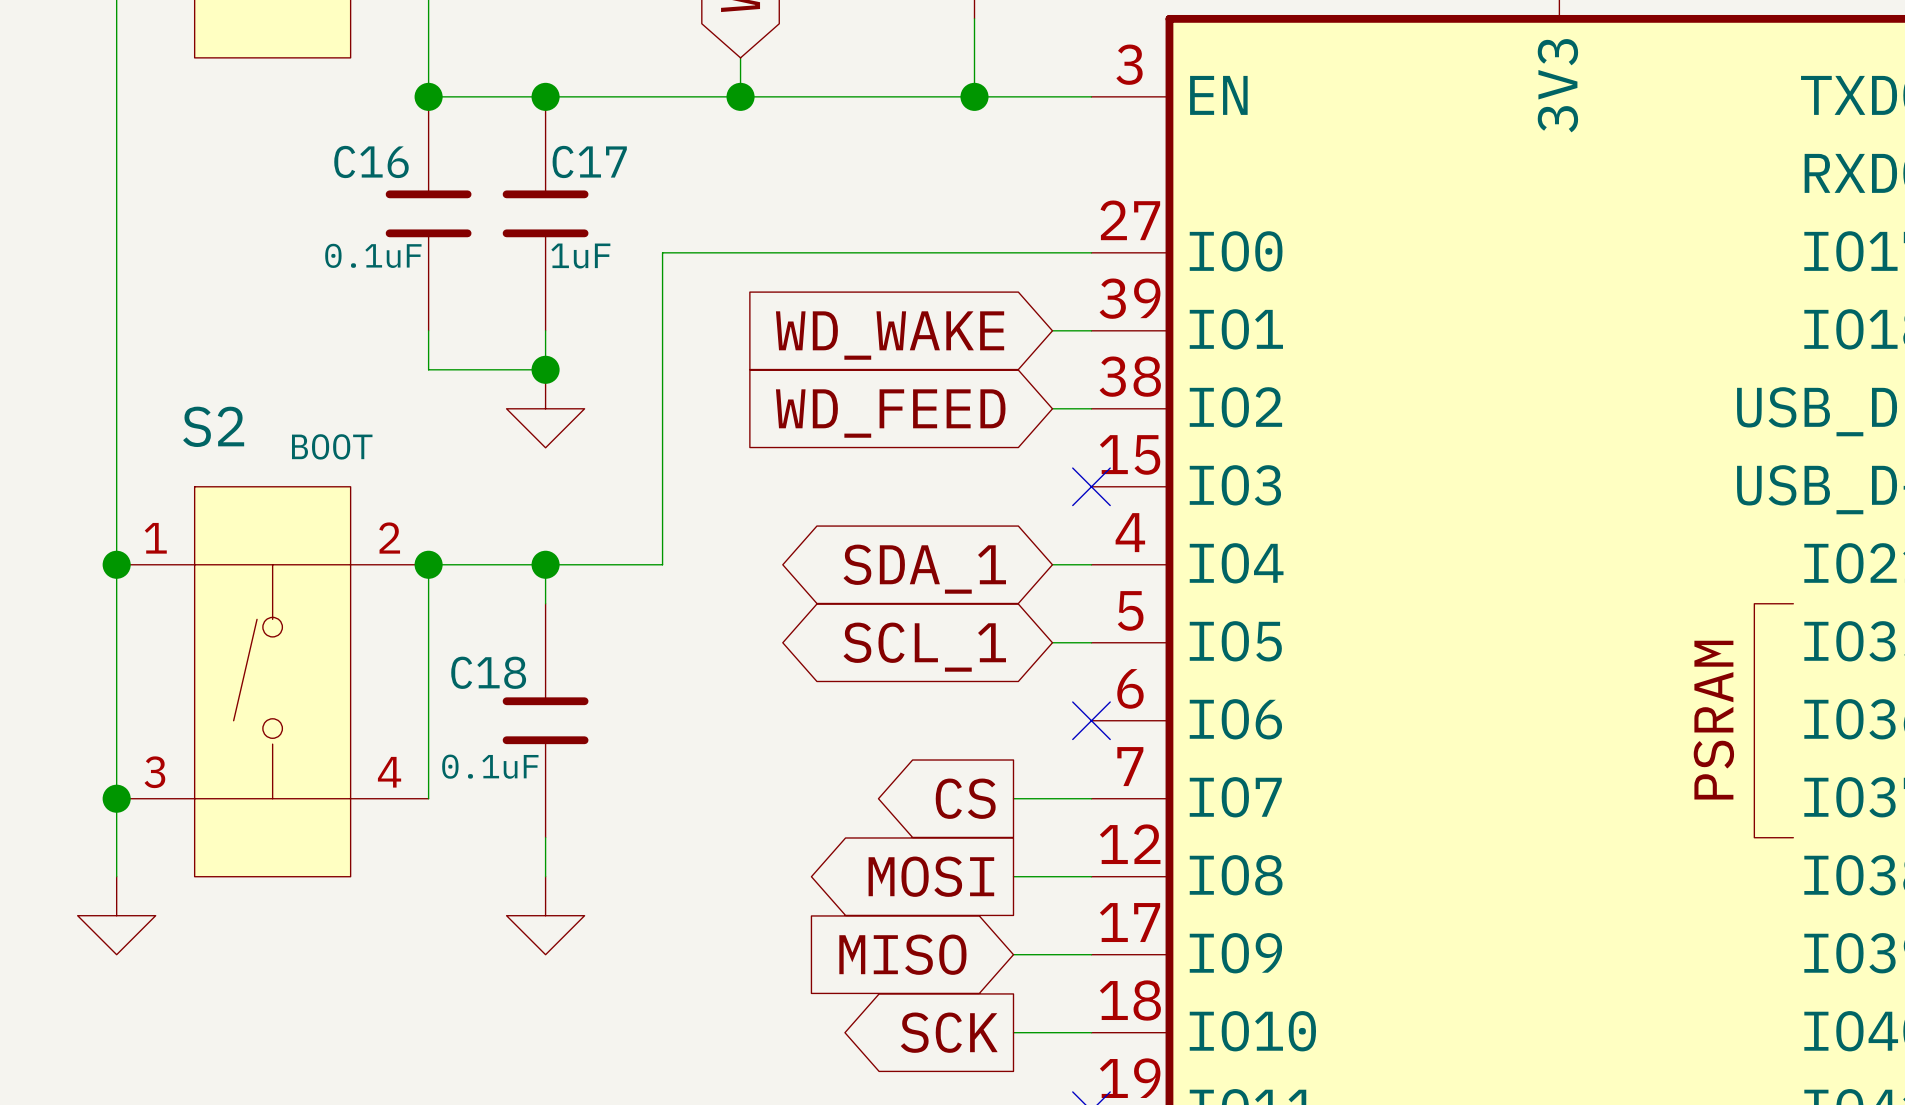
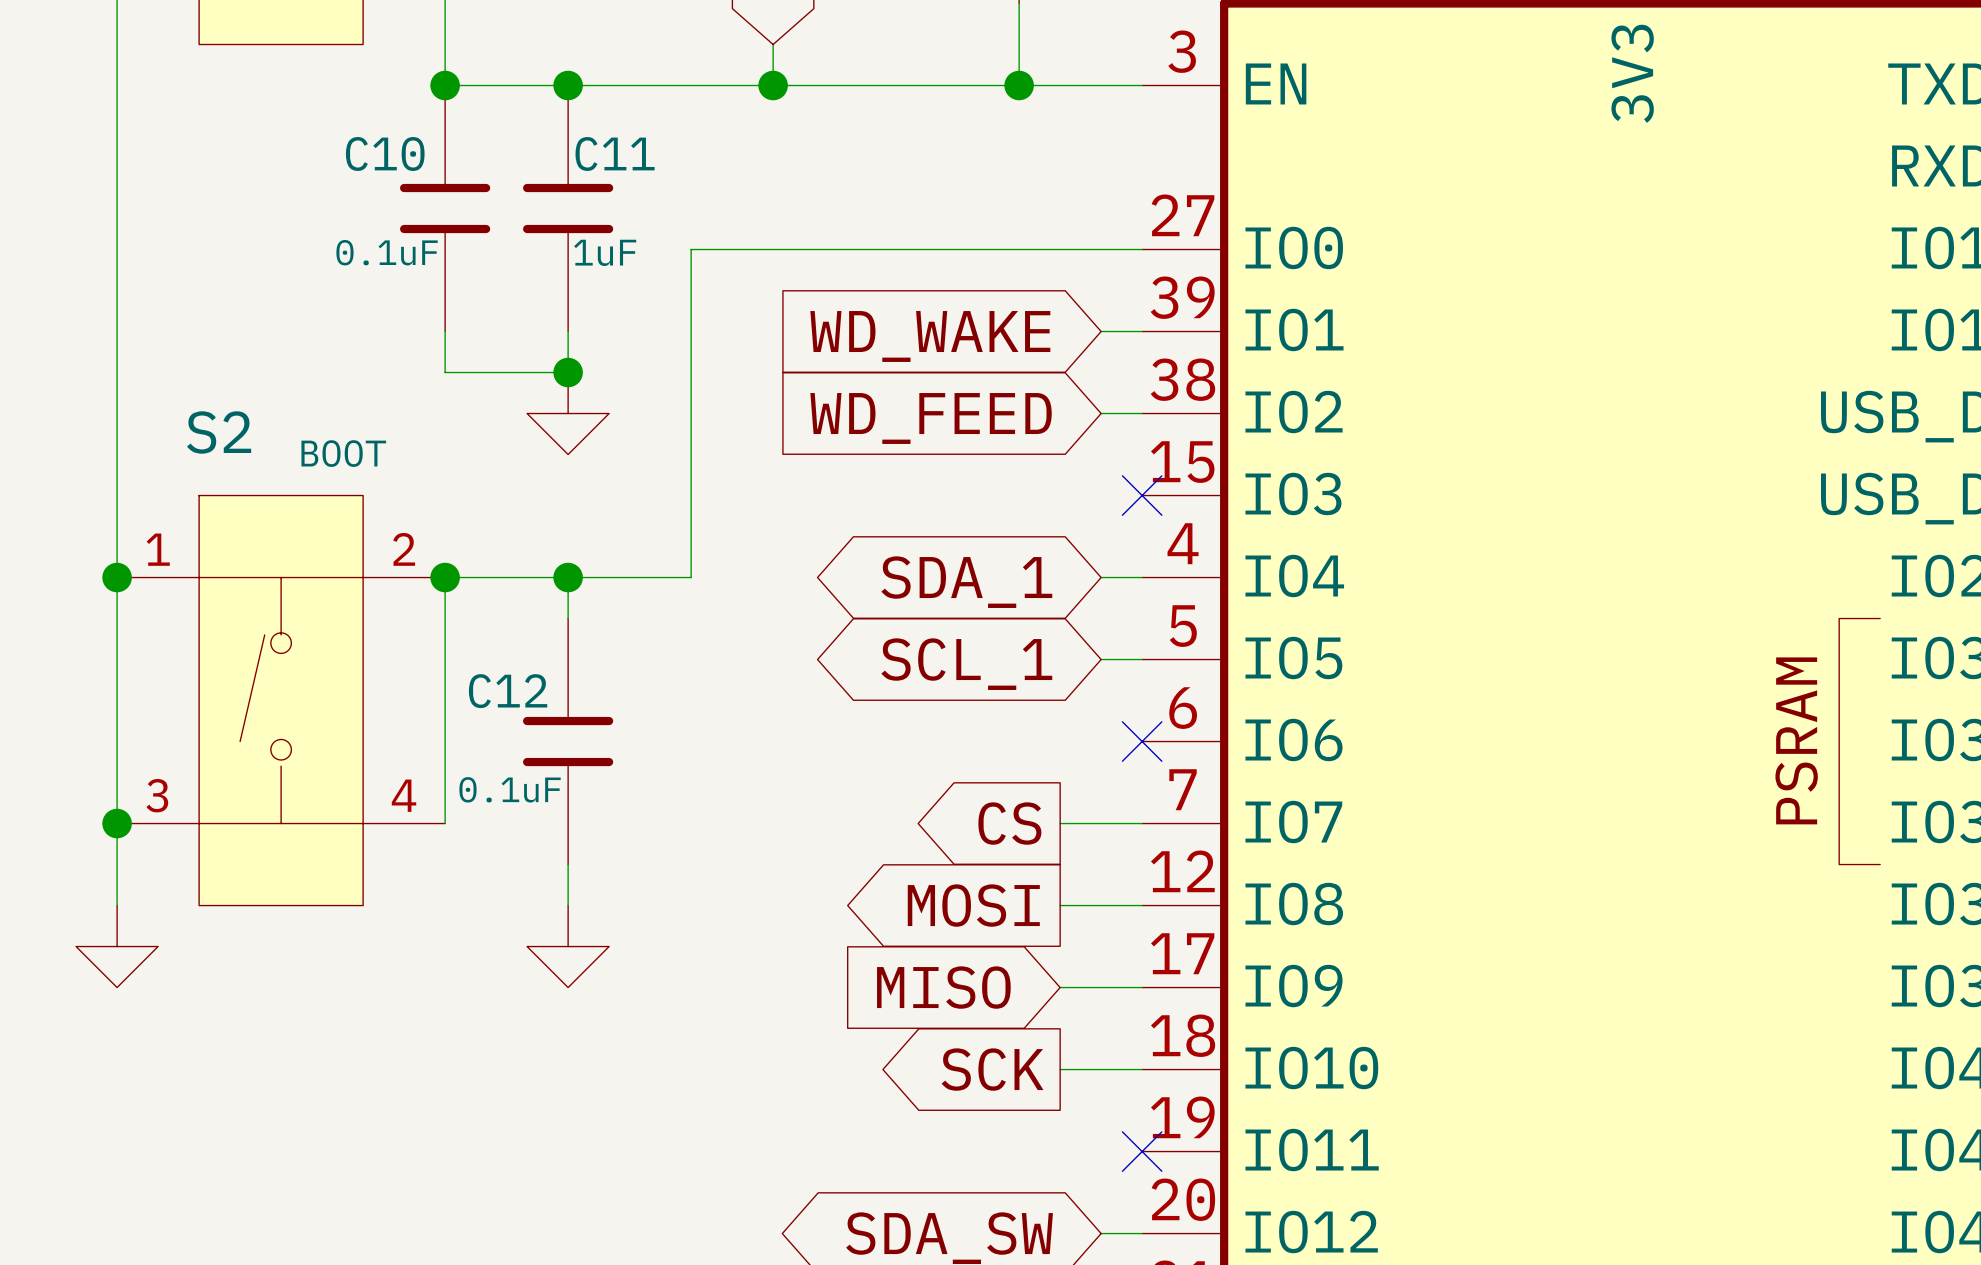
C16 name: C16 (371, 161) -> C10 (385, 153)
C17 name: C17 (589, 161) -> C11 (615, 153)
C18 name: C18 (488, 672) -> C12 (508, 691)

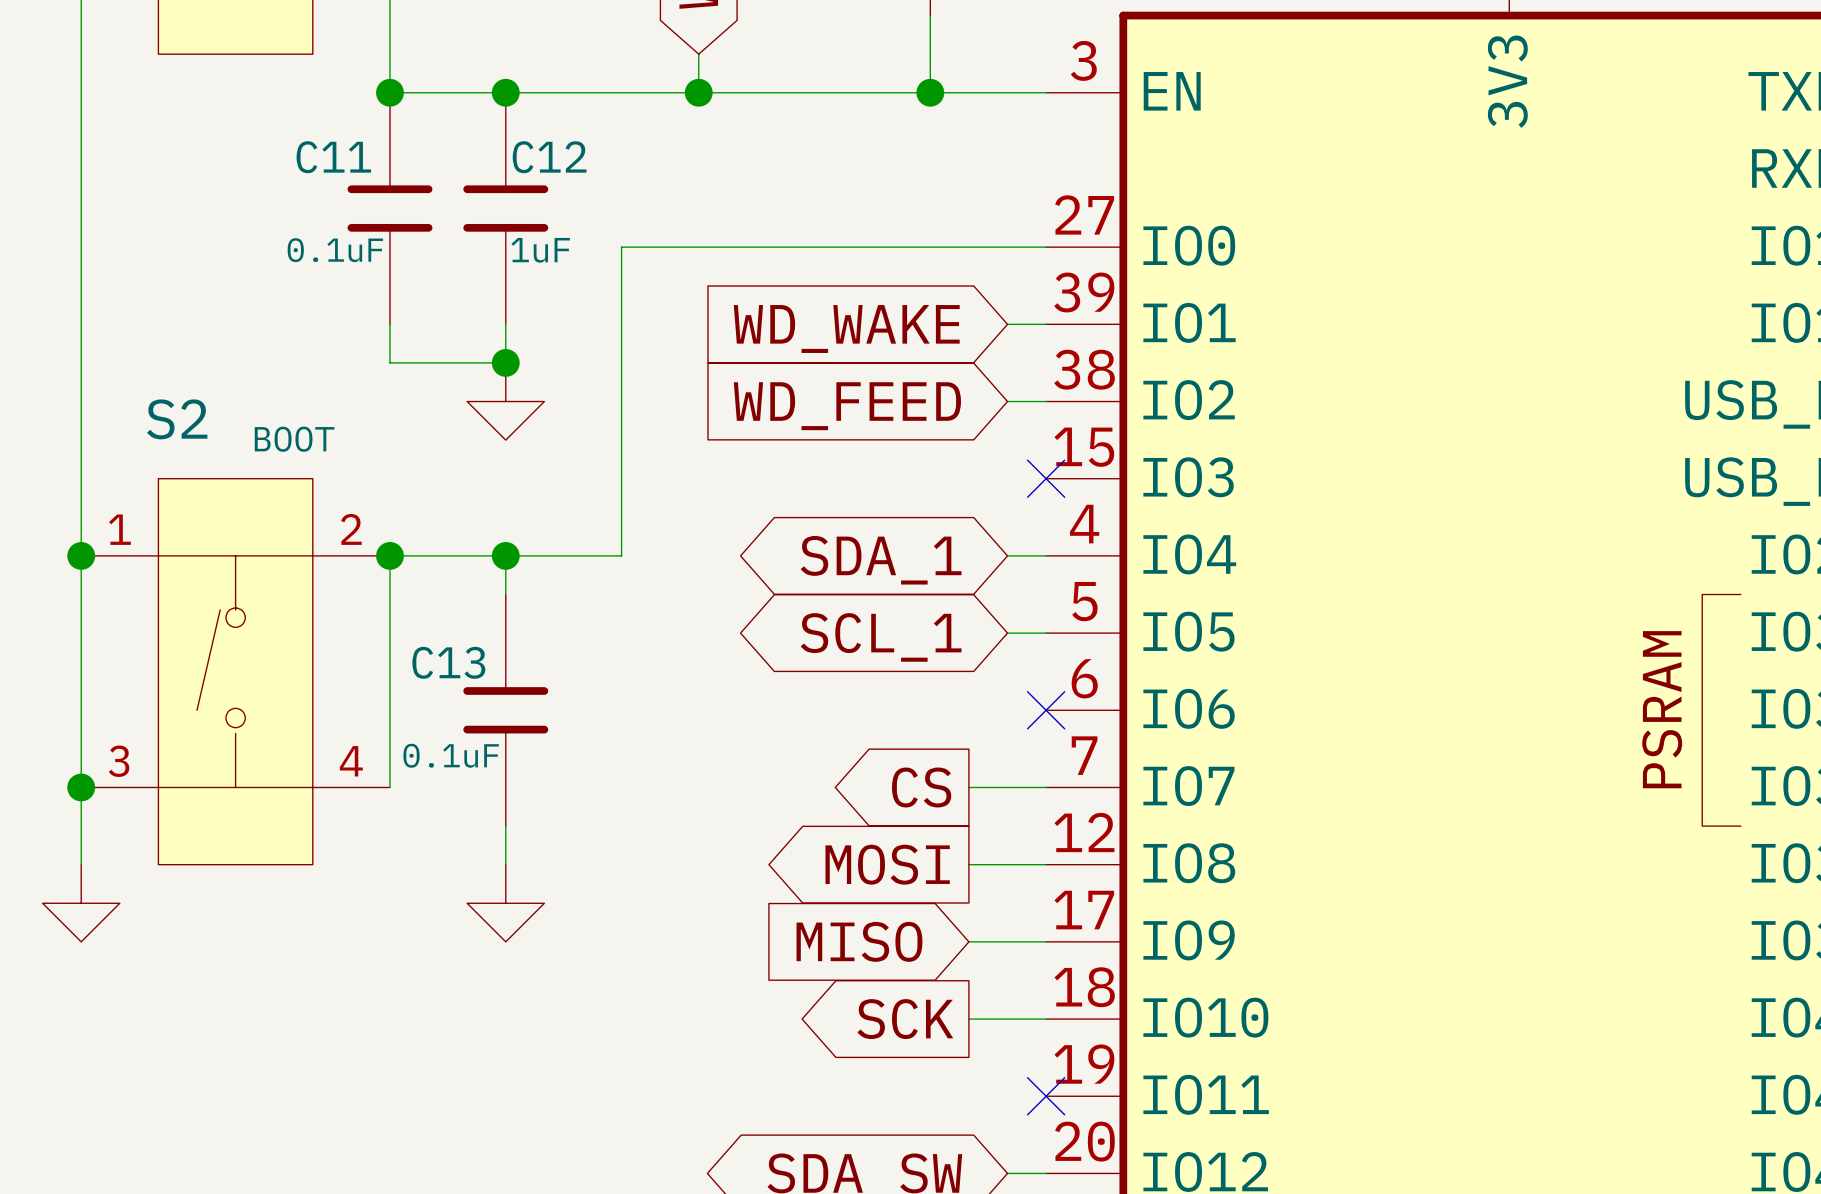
C10 name: C10 (385, 153) -> C11 (333, 157)
C11 name: C11 (615, 153) -> C12 (549, 157)
C12 name: C12 (508, 691) -> C13 (448, 662)

